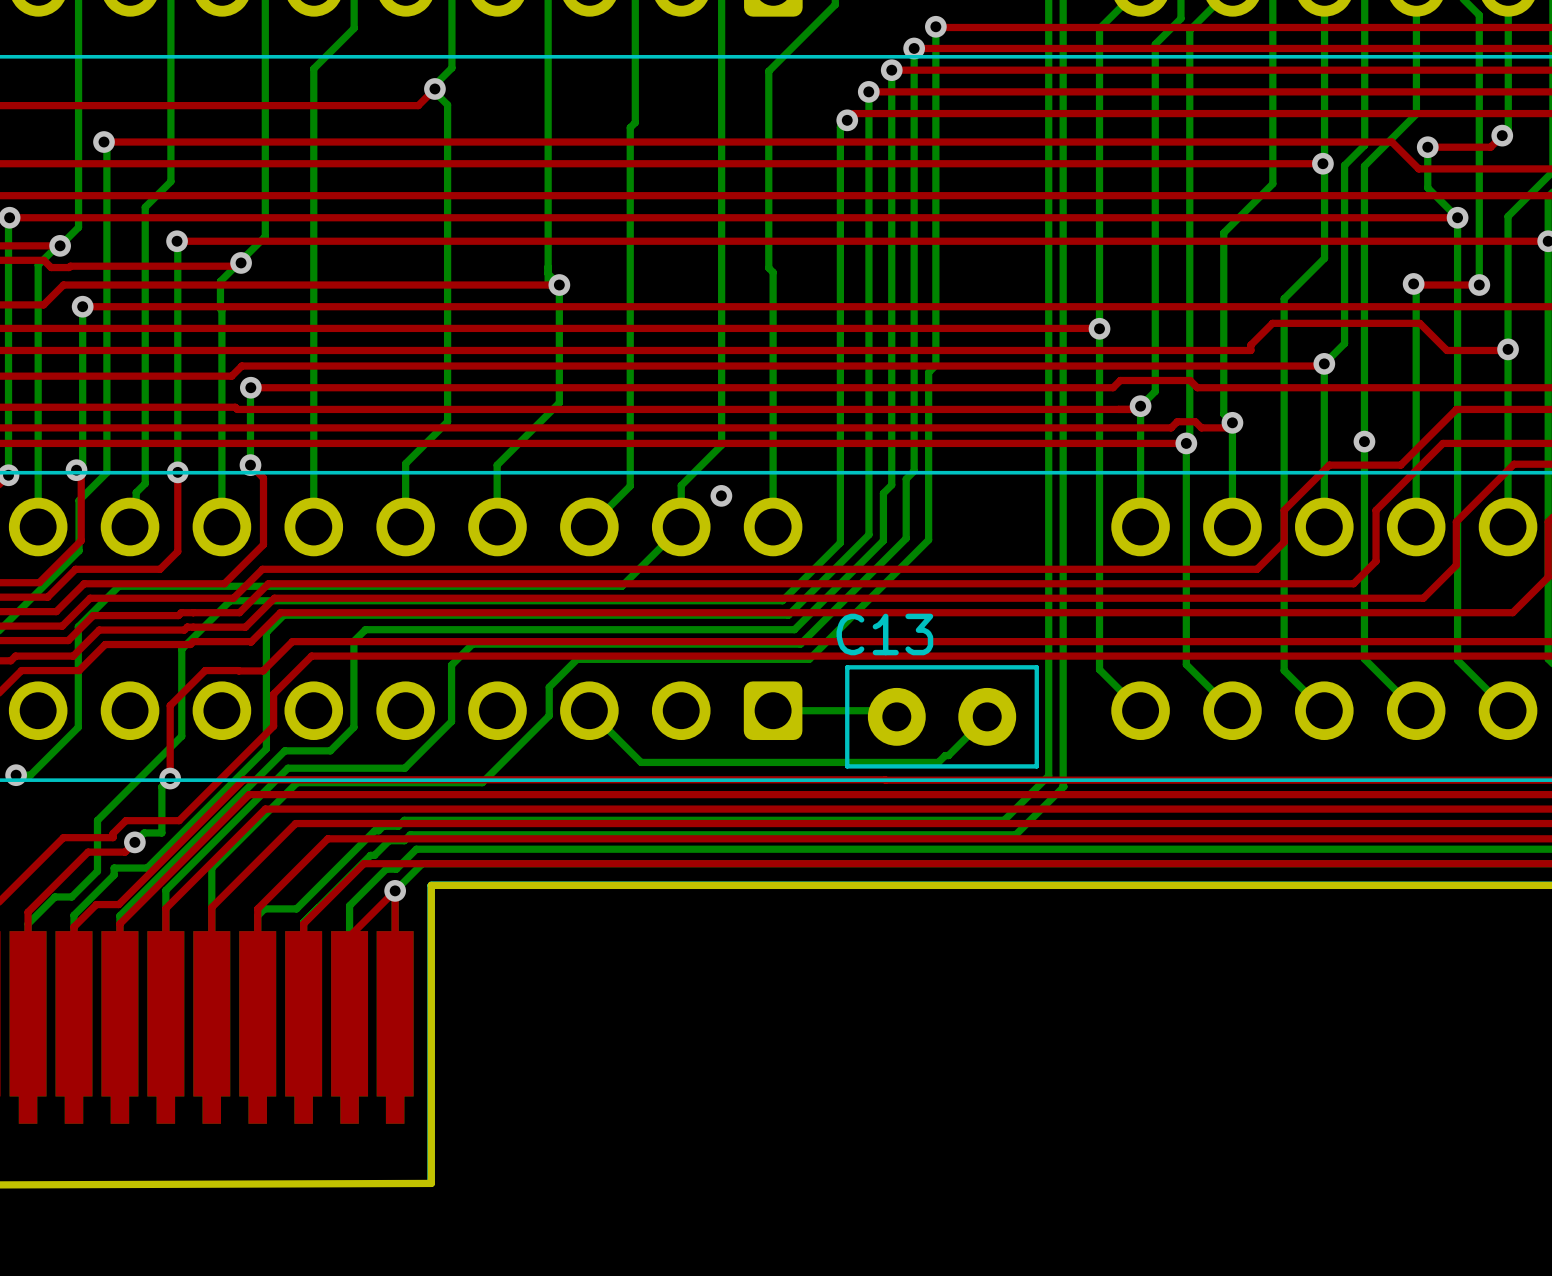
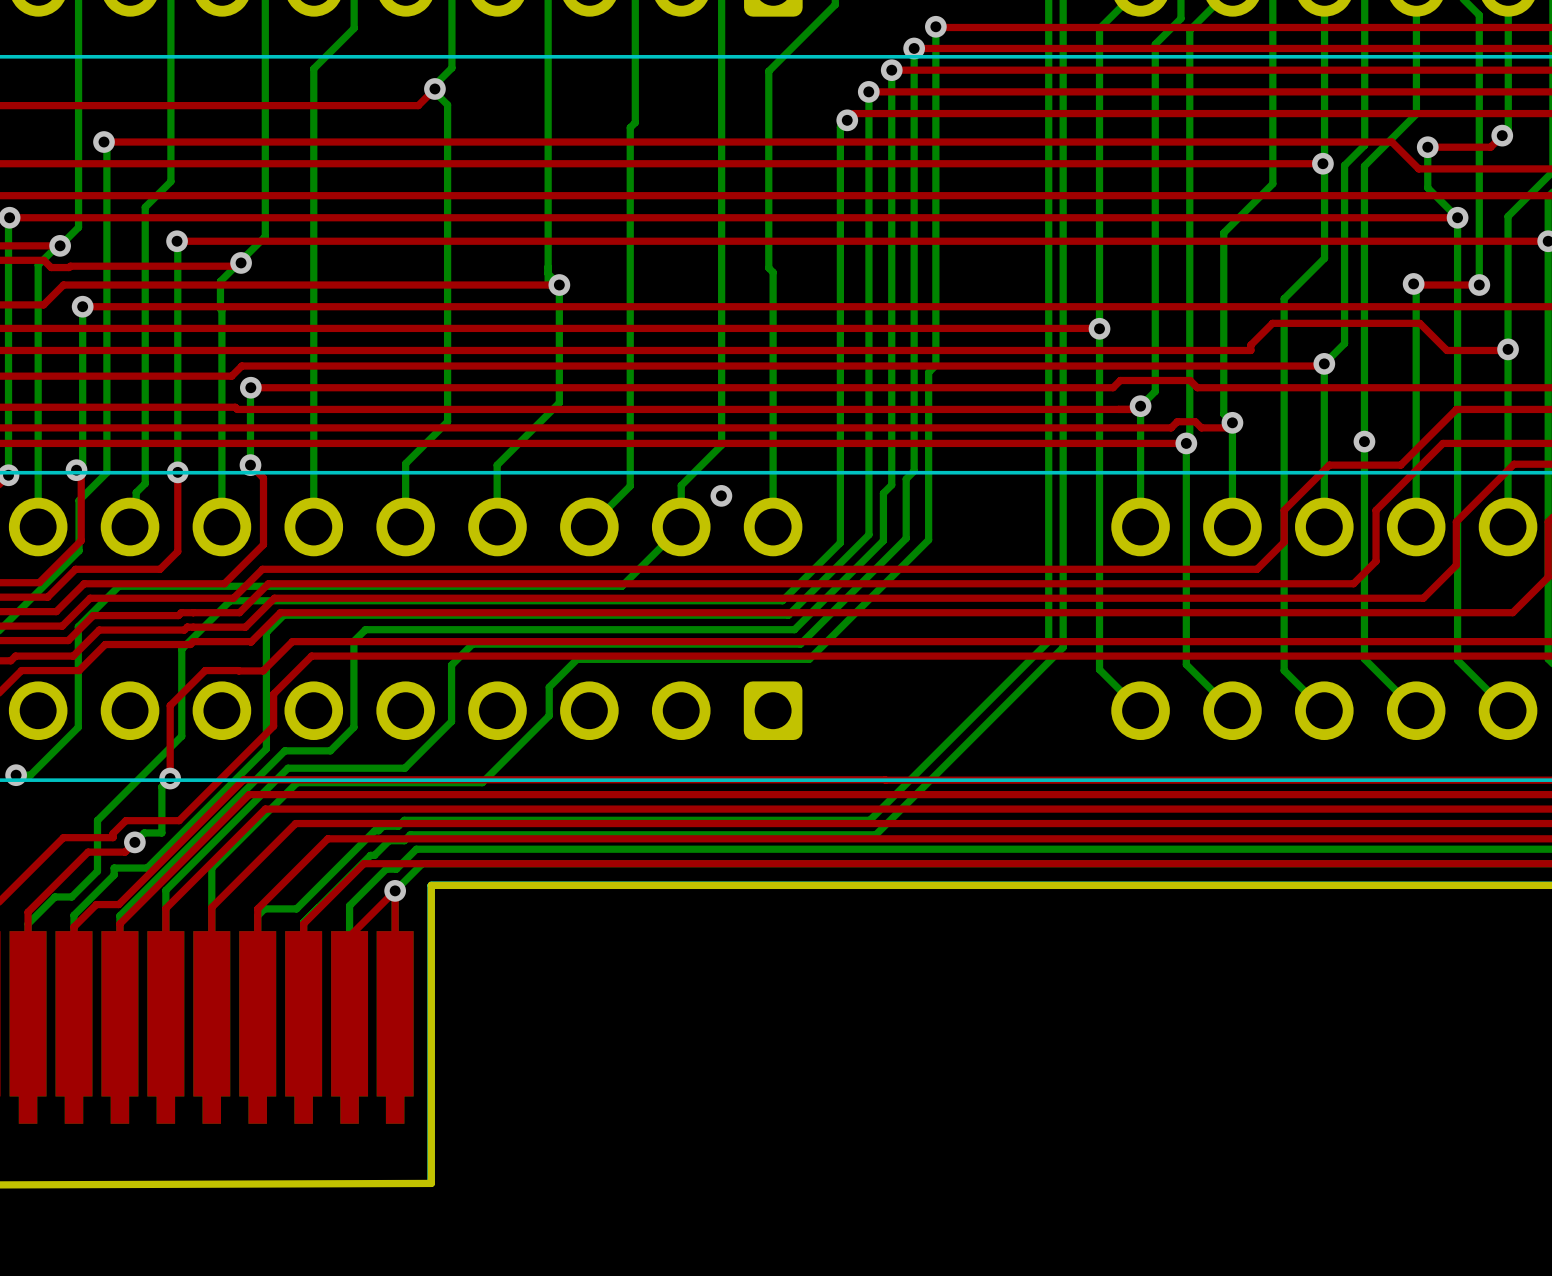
bottom track: (1048, 641) (1048, 775) (1004, 820) (869, 820) -> (1048, 641) (869, 820)
bottom track: (1063, 647) (1063, 786) (1015, 834) (875, 834) -> (1063, 647) (875, 834)
bottom track: (589, 710) (641, 762) (938, 762) (945, 755) (948, 755) (987, 716) -> none
bottom track: (773, 710) (890, 710) -> none
C13: (942, 716) -> none

